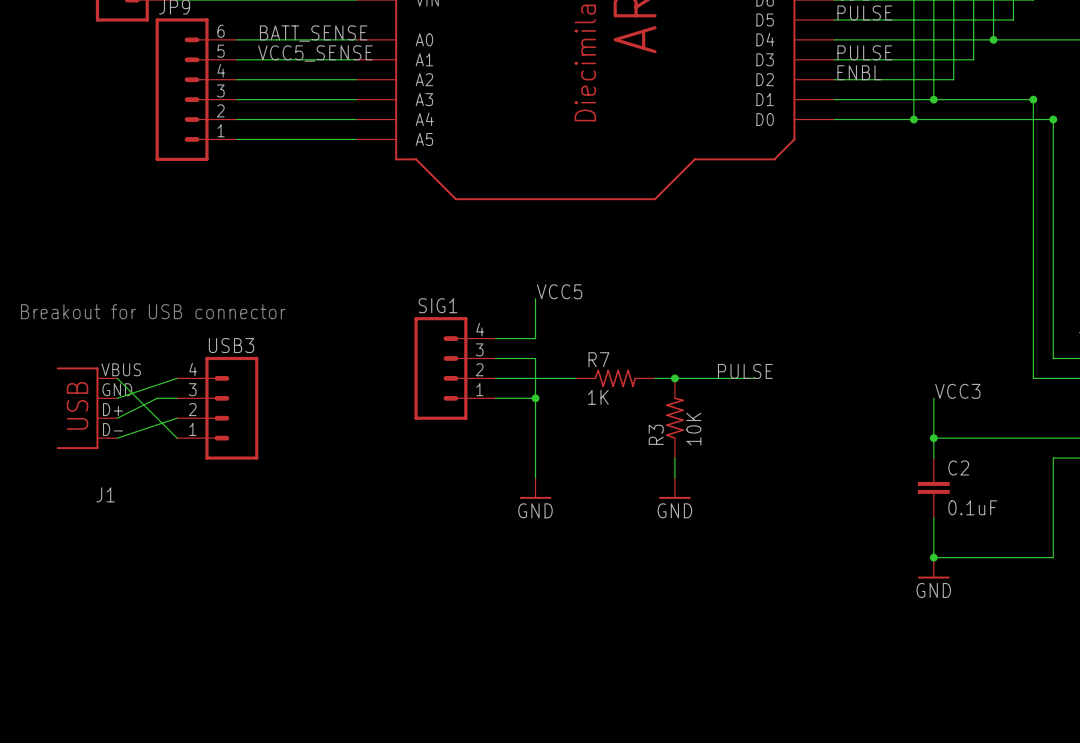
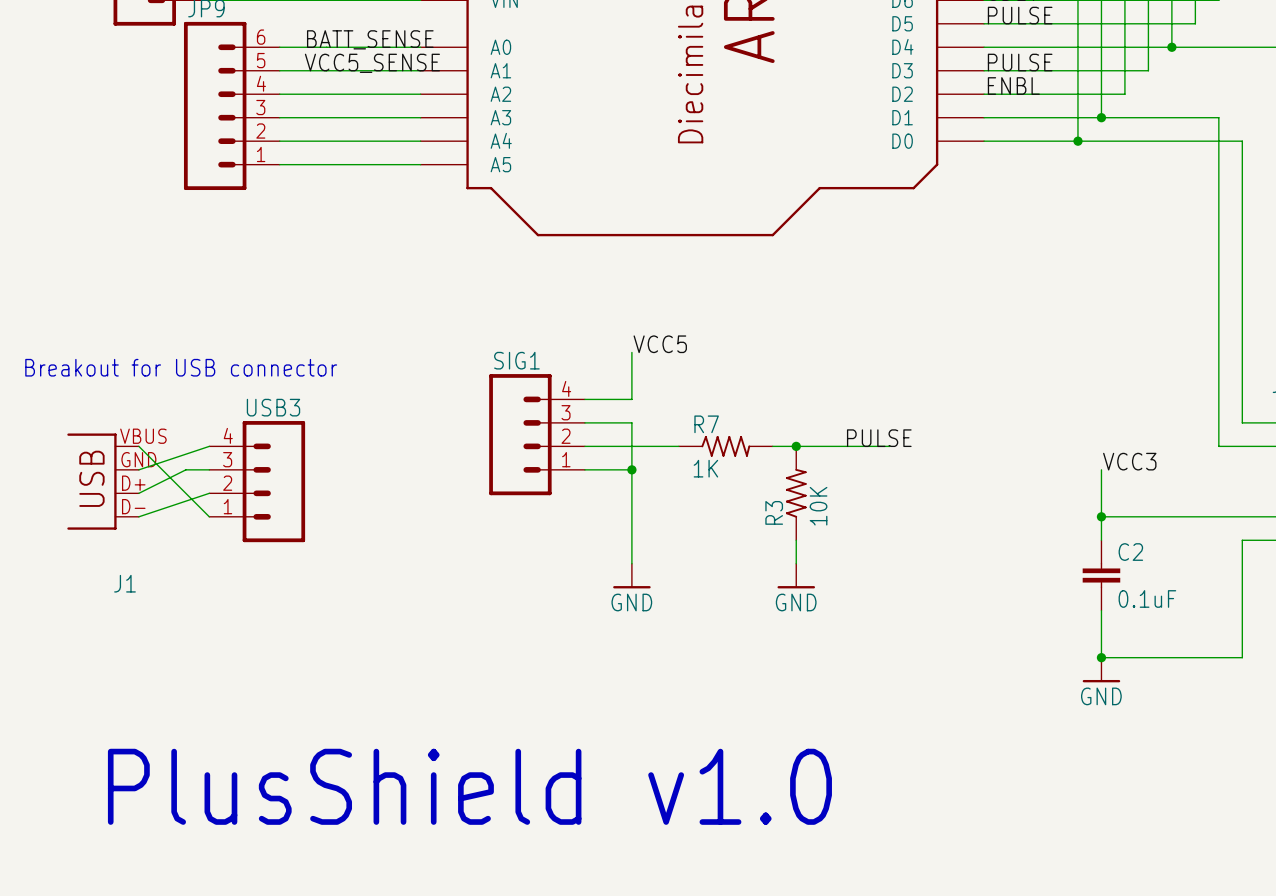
junction: (1033, 99) -> none
junction: (1053, 119) -> none
text: none -> PlusShield v1.0 (469, 786)

